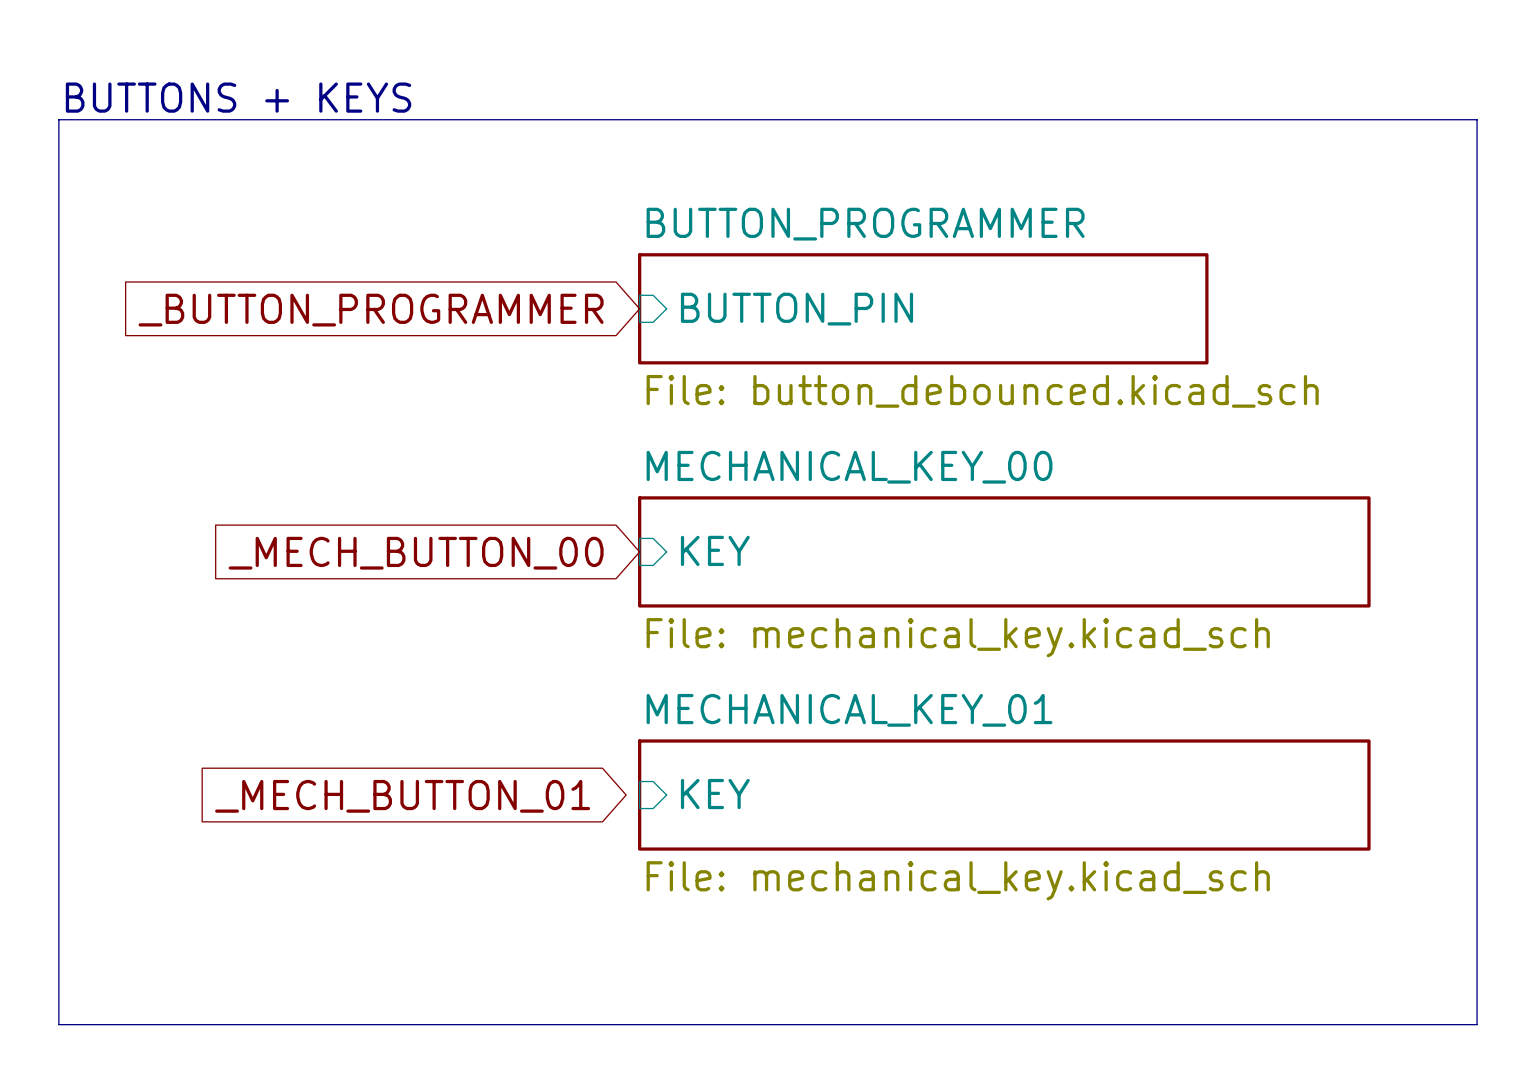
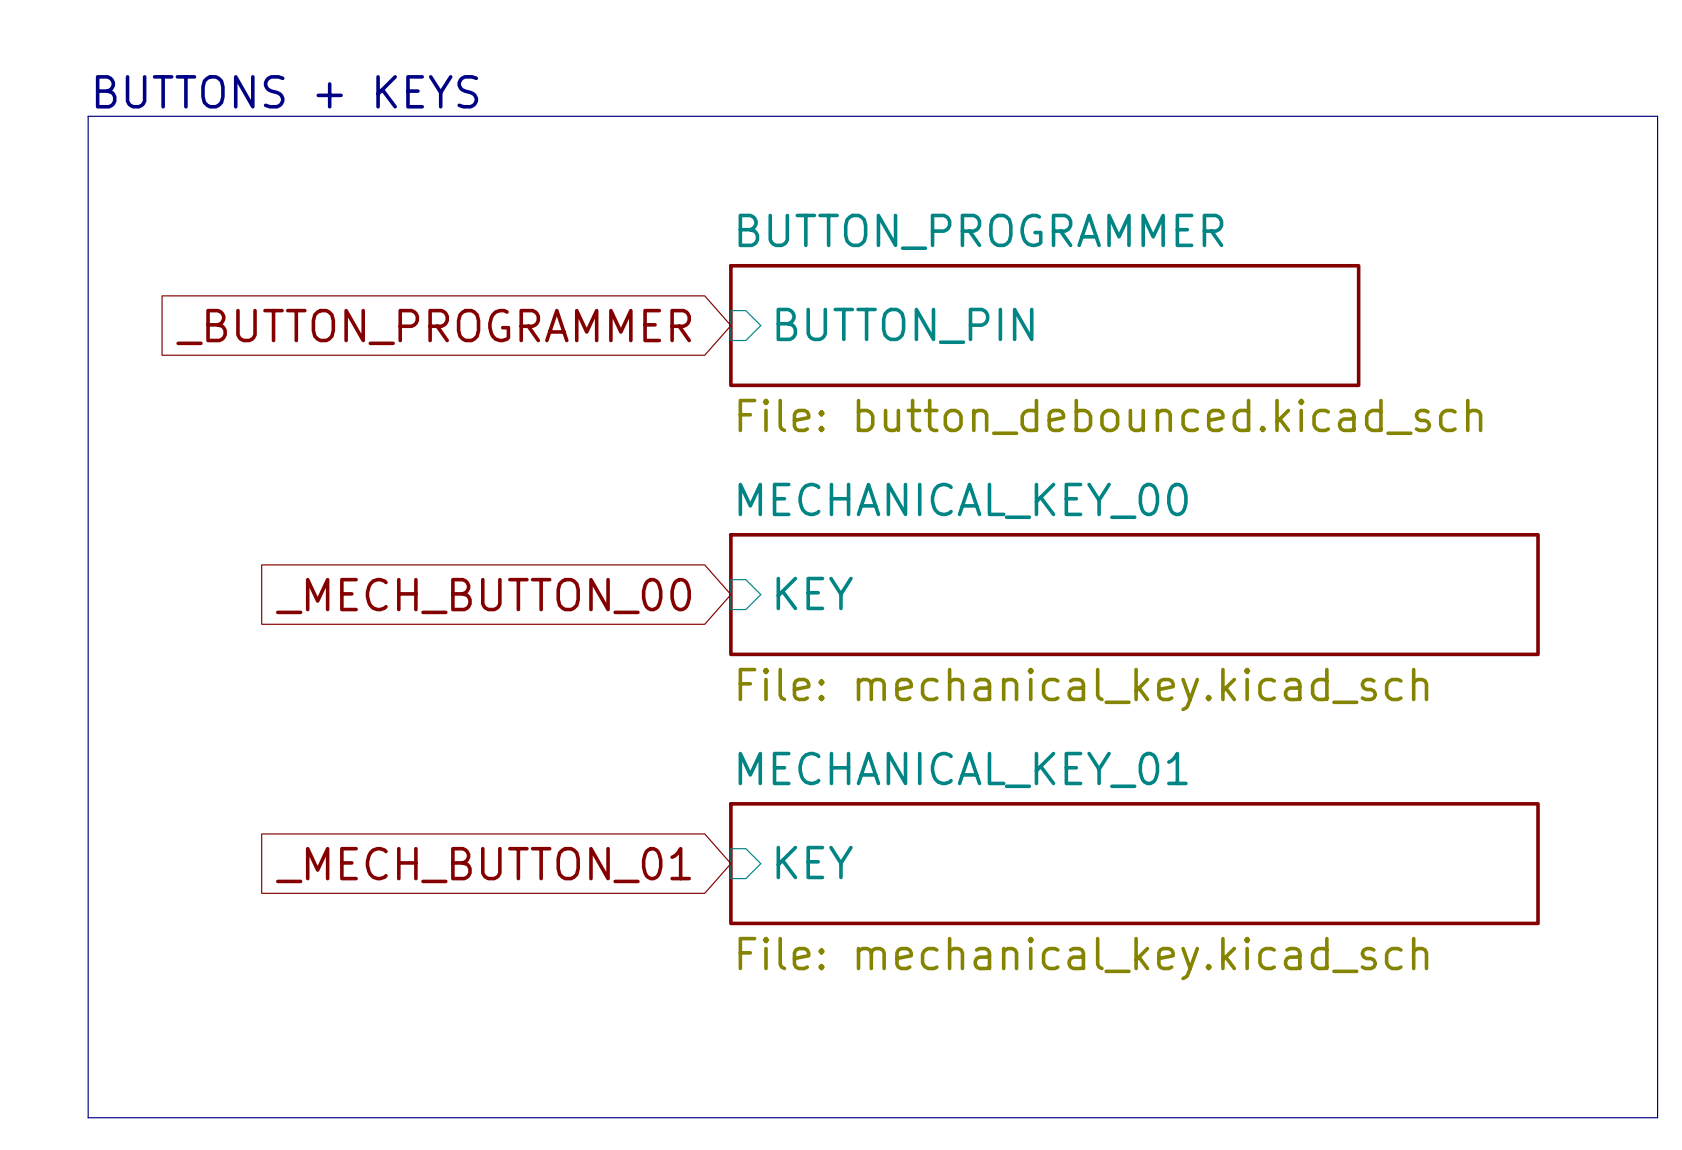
global label position: _MECH_BUTTON_01 (402, 796) -> _MECH_BUTTON_01 (483, 865)

